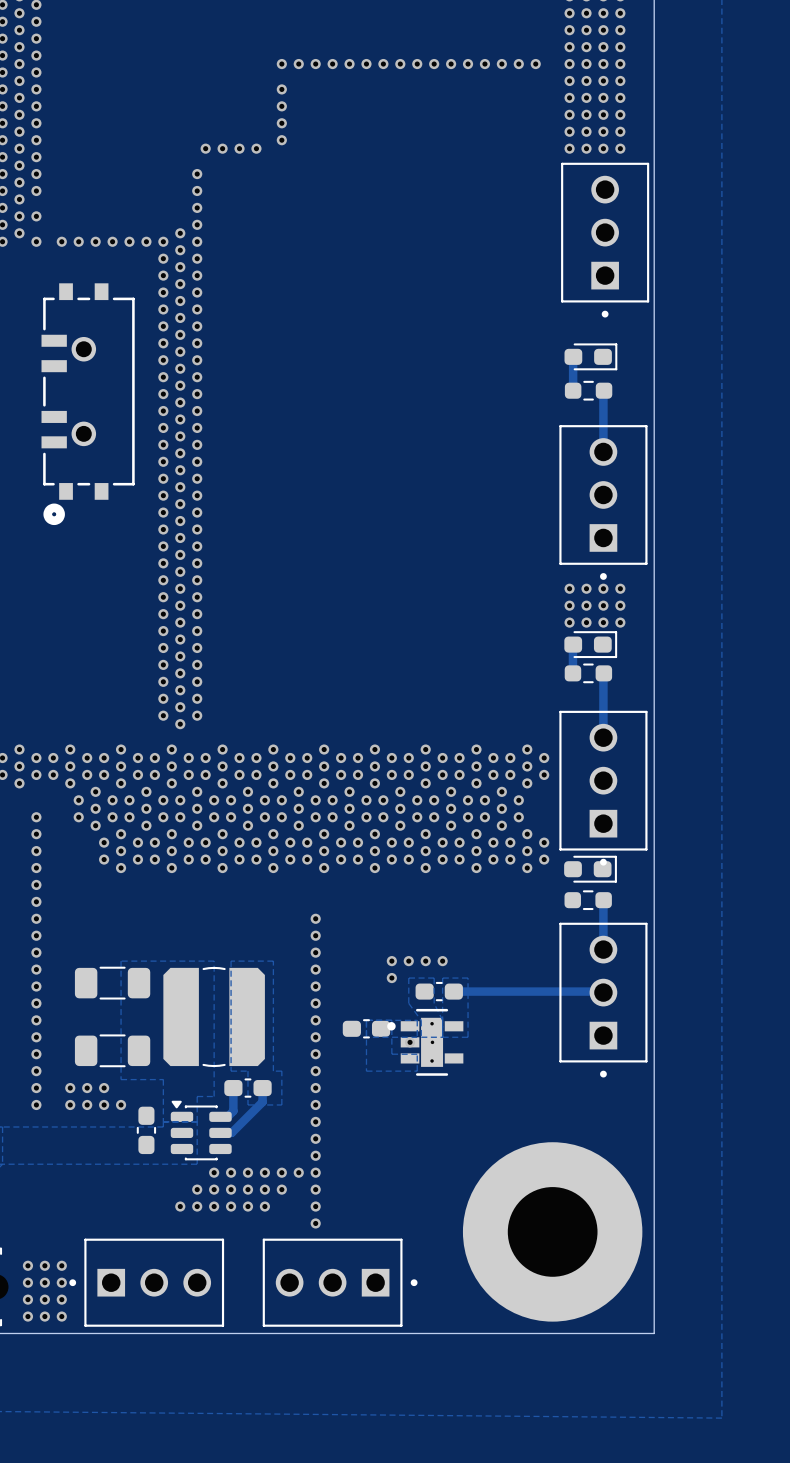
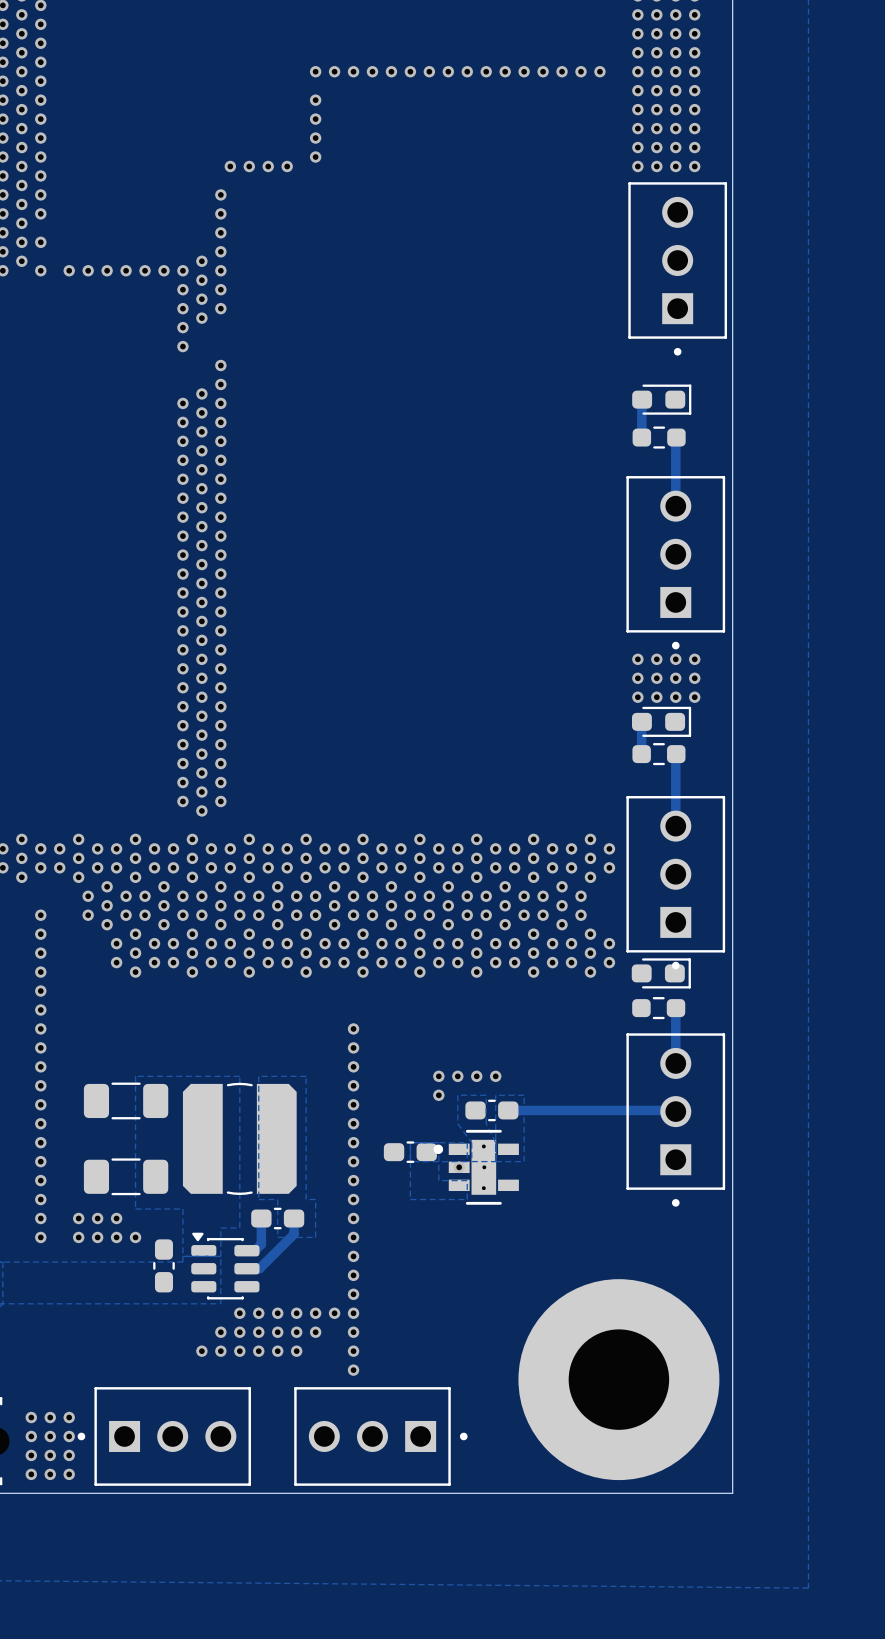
via: (197, 292) -> none
via: (180, 301) -> none
via: (197, 309) -> none
via: (180, 317) -> none
via: (163, 326) -> none
via: (180, 334) -> none
via: (163, 343) -> none
part: (88, 404) -> none

